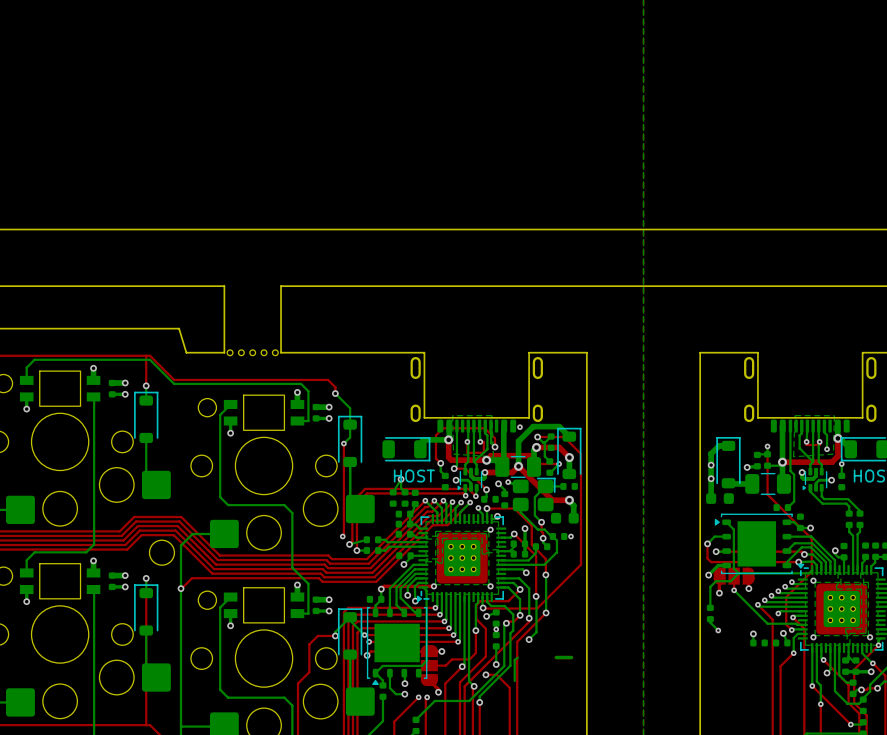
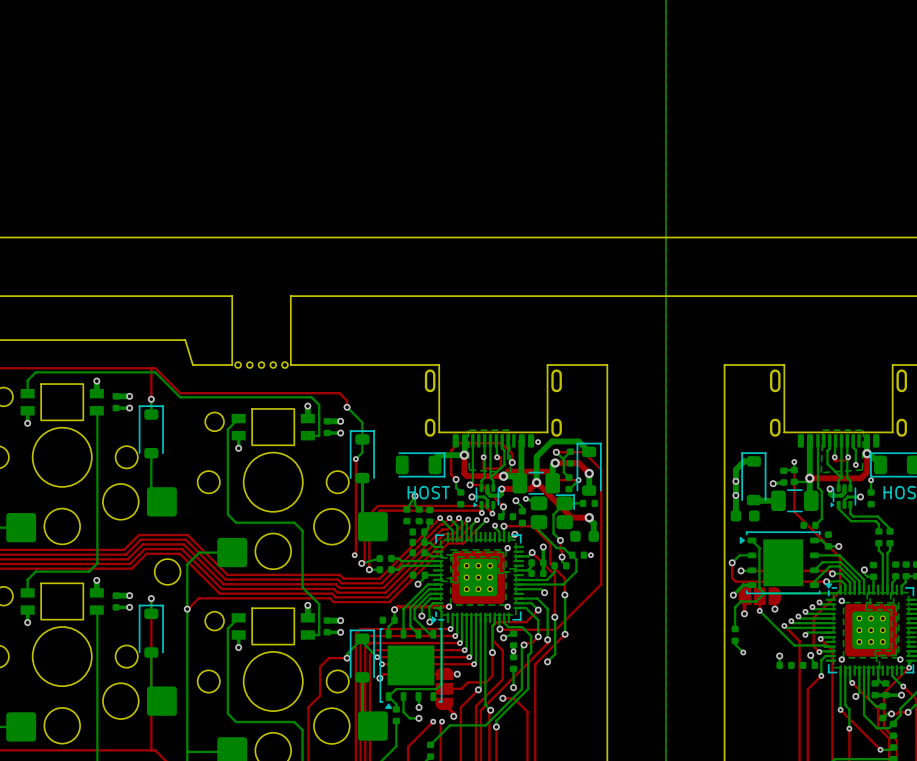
bottom track: (517, 657) (514, 659) (514, 681) -> none
bottom track: (571, 657) (556, 657) -> none

